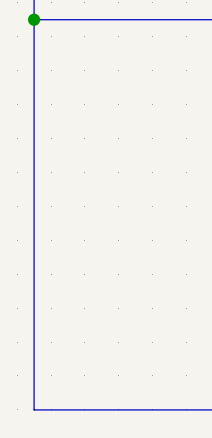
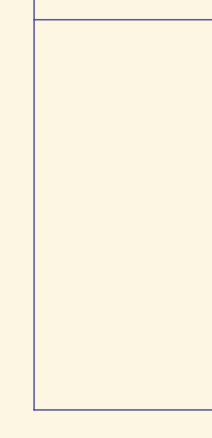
junction: (34, 19) -> none

